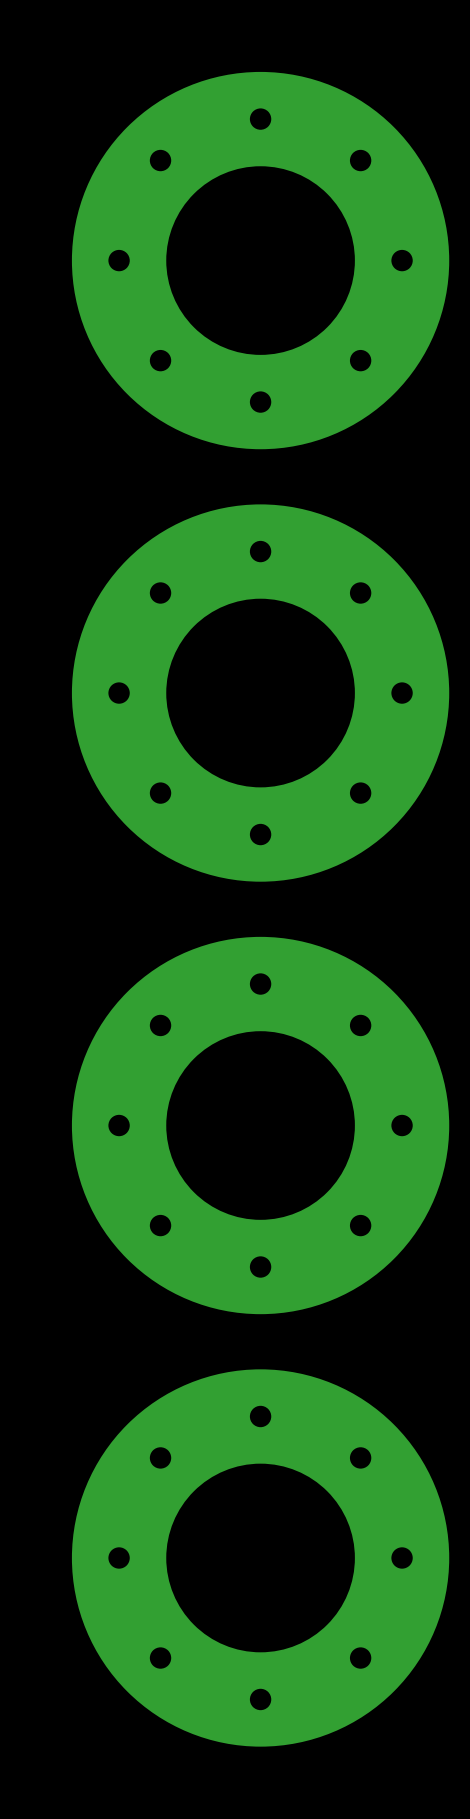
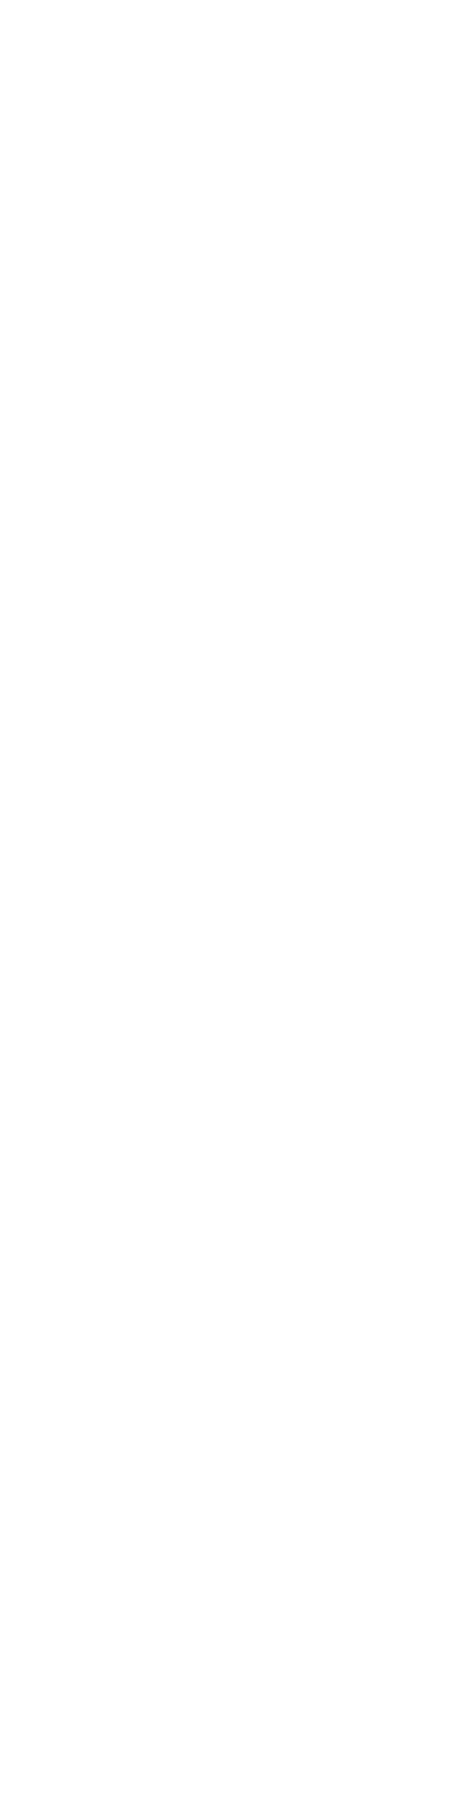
part: (260, 260) -> none
part: (260, 693) -> none
part: (260, 1125) -> none
part: (260, 1557) -> none

